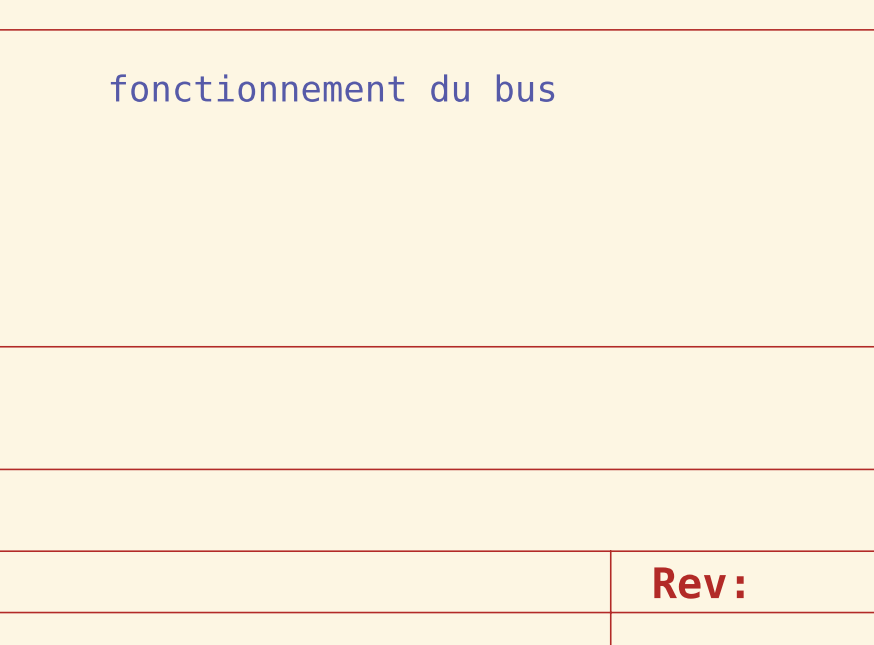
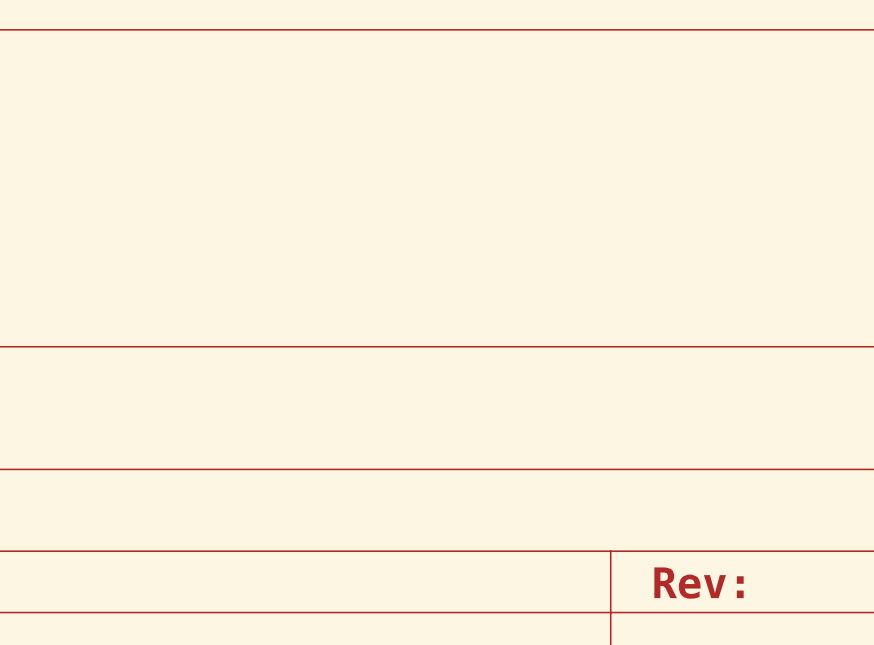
text: fonctionnement du bus (332, 88) -> none

